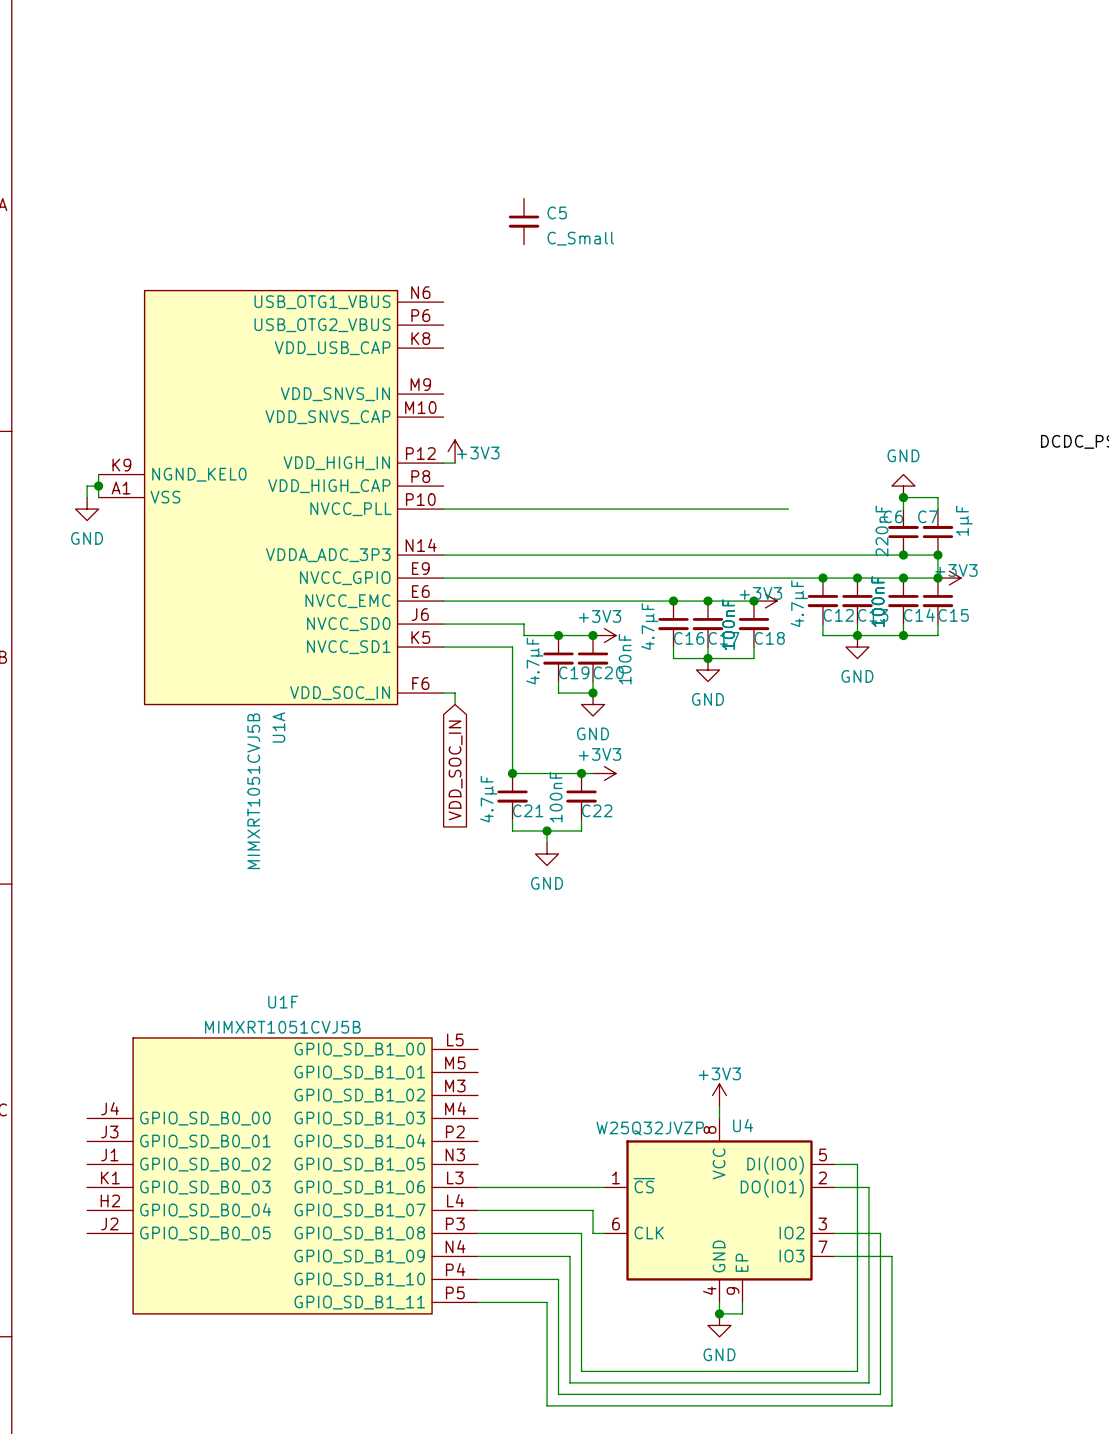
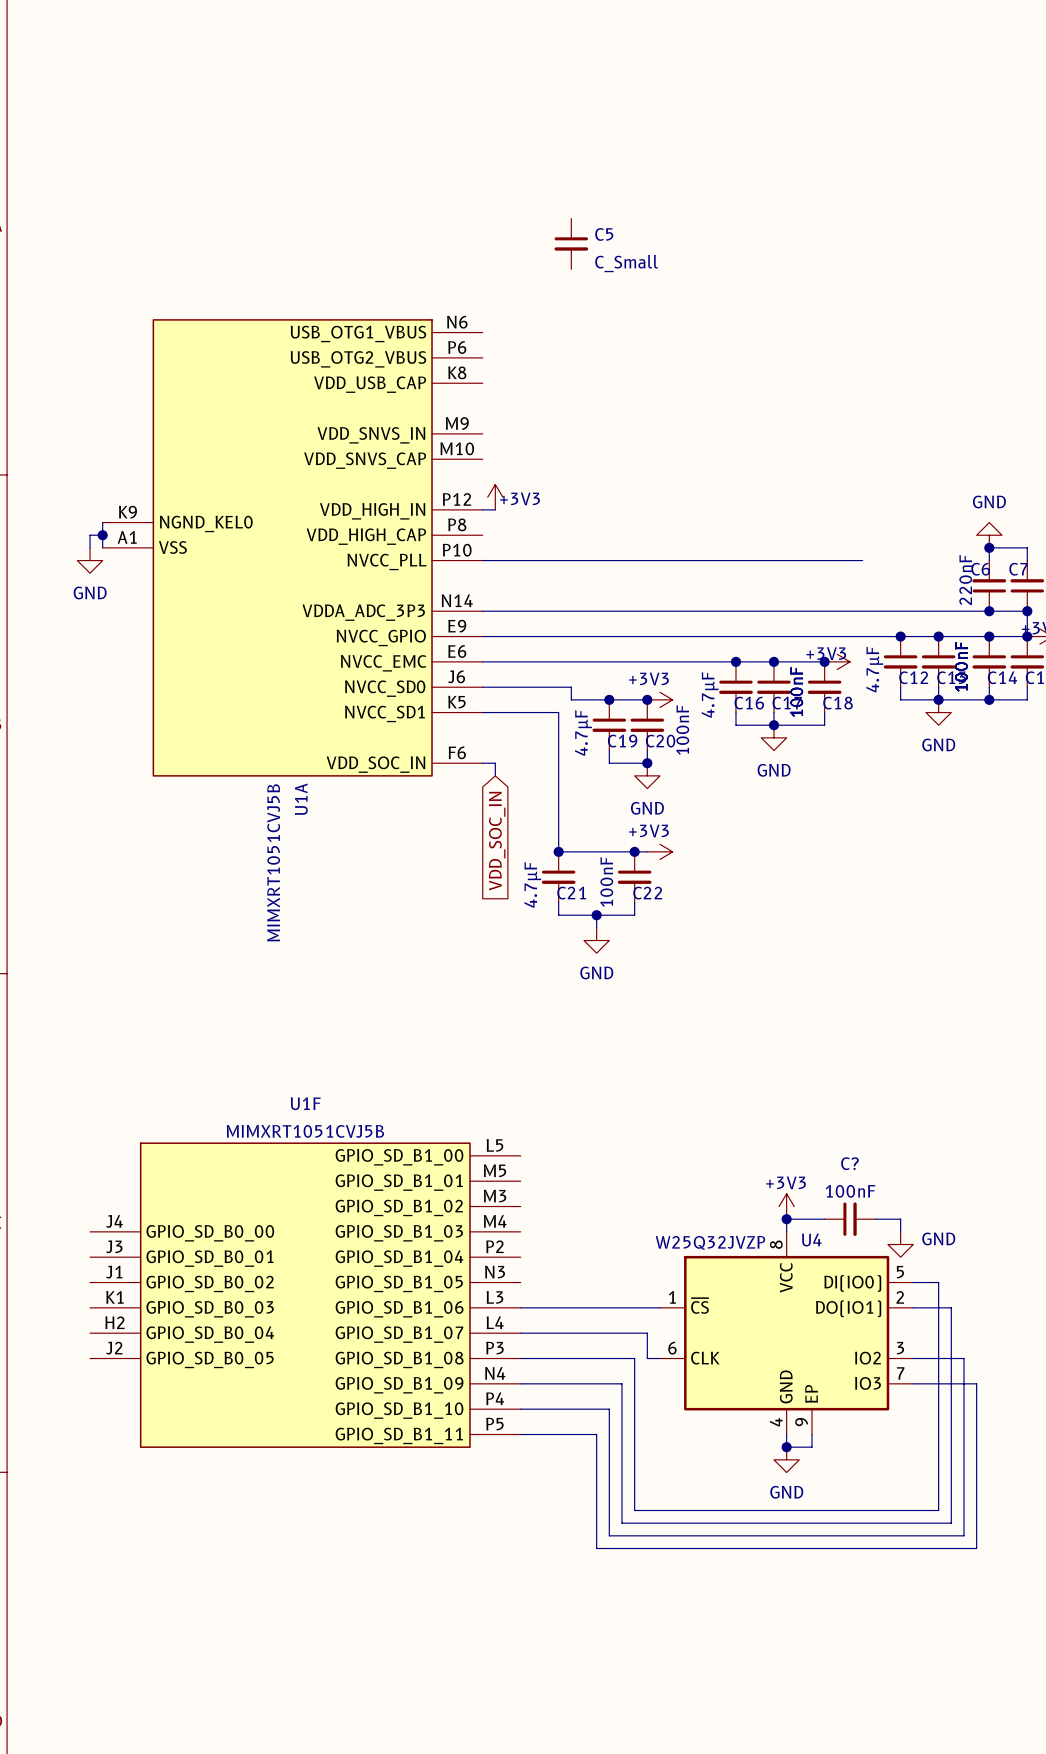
wire: none -> (786, 1219) (824, 1219)
junction: none -> (786, 1219)
C?: none -> 100nF (849, 1219)
wire: none -> (875, 1219) (900, 1219) (900, 1231)
power symbol: none -> GND (900, 1244)

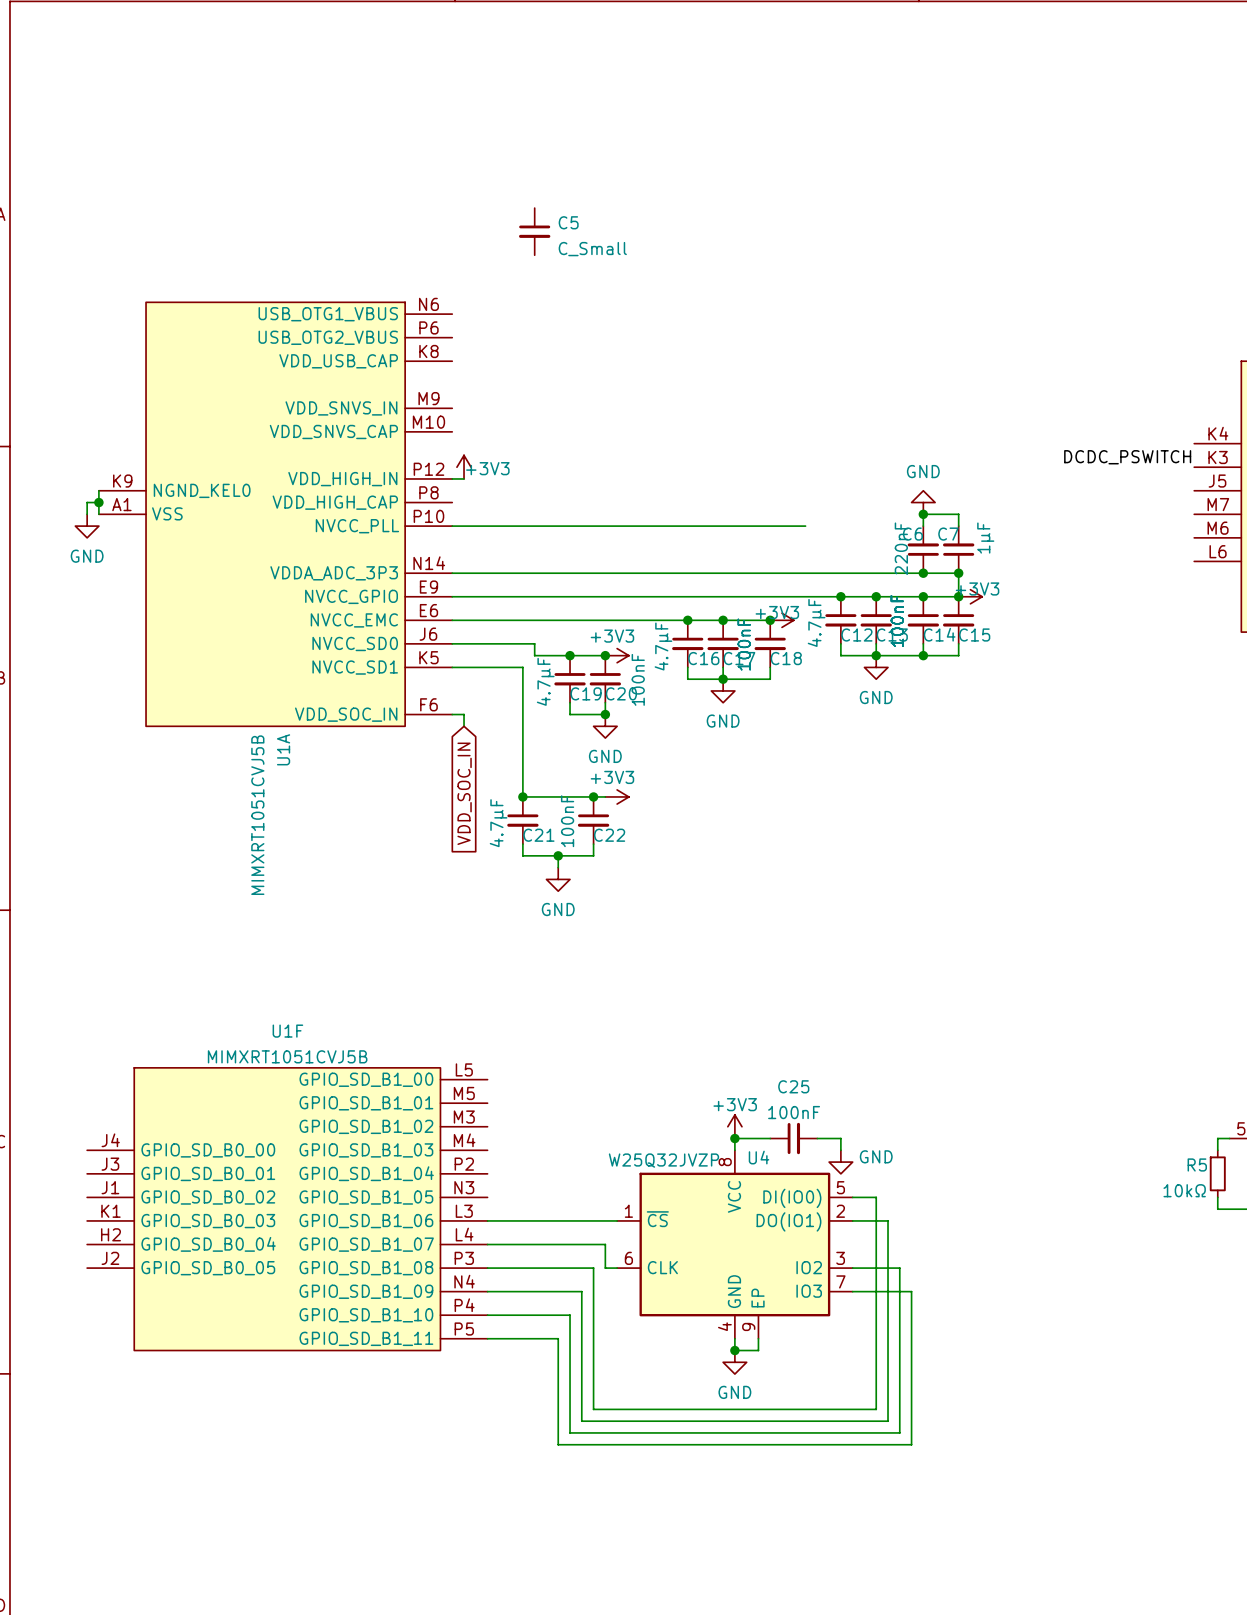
C? name: C? (849, 1163) -> C25 (793, 1086)

